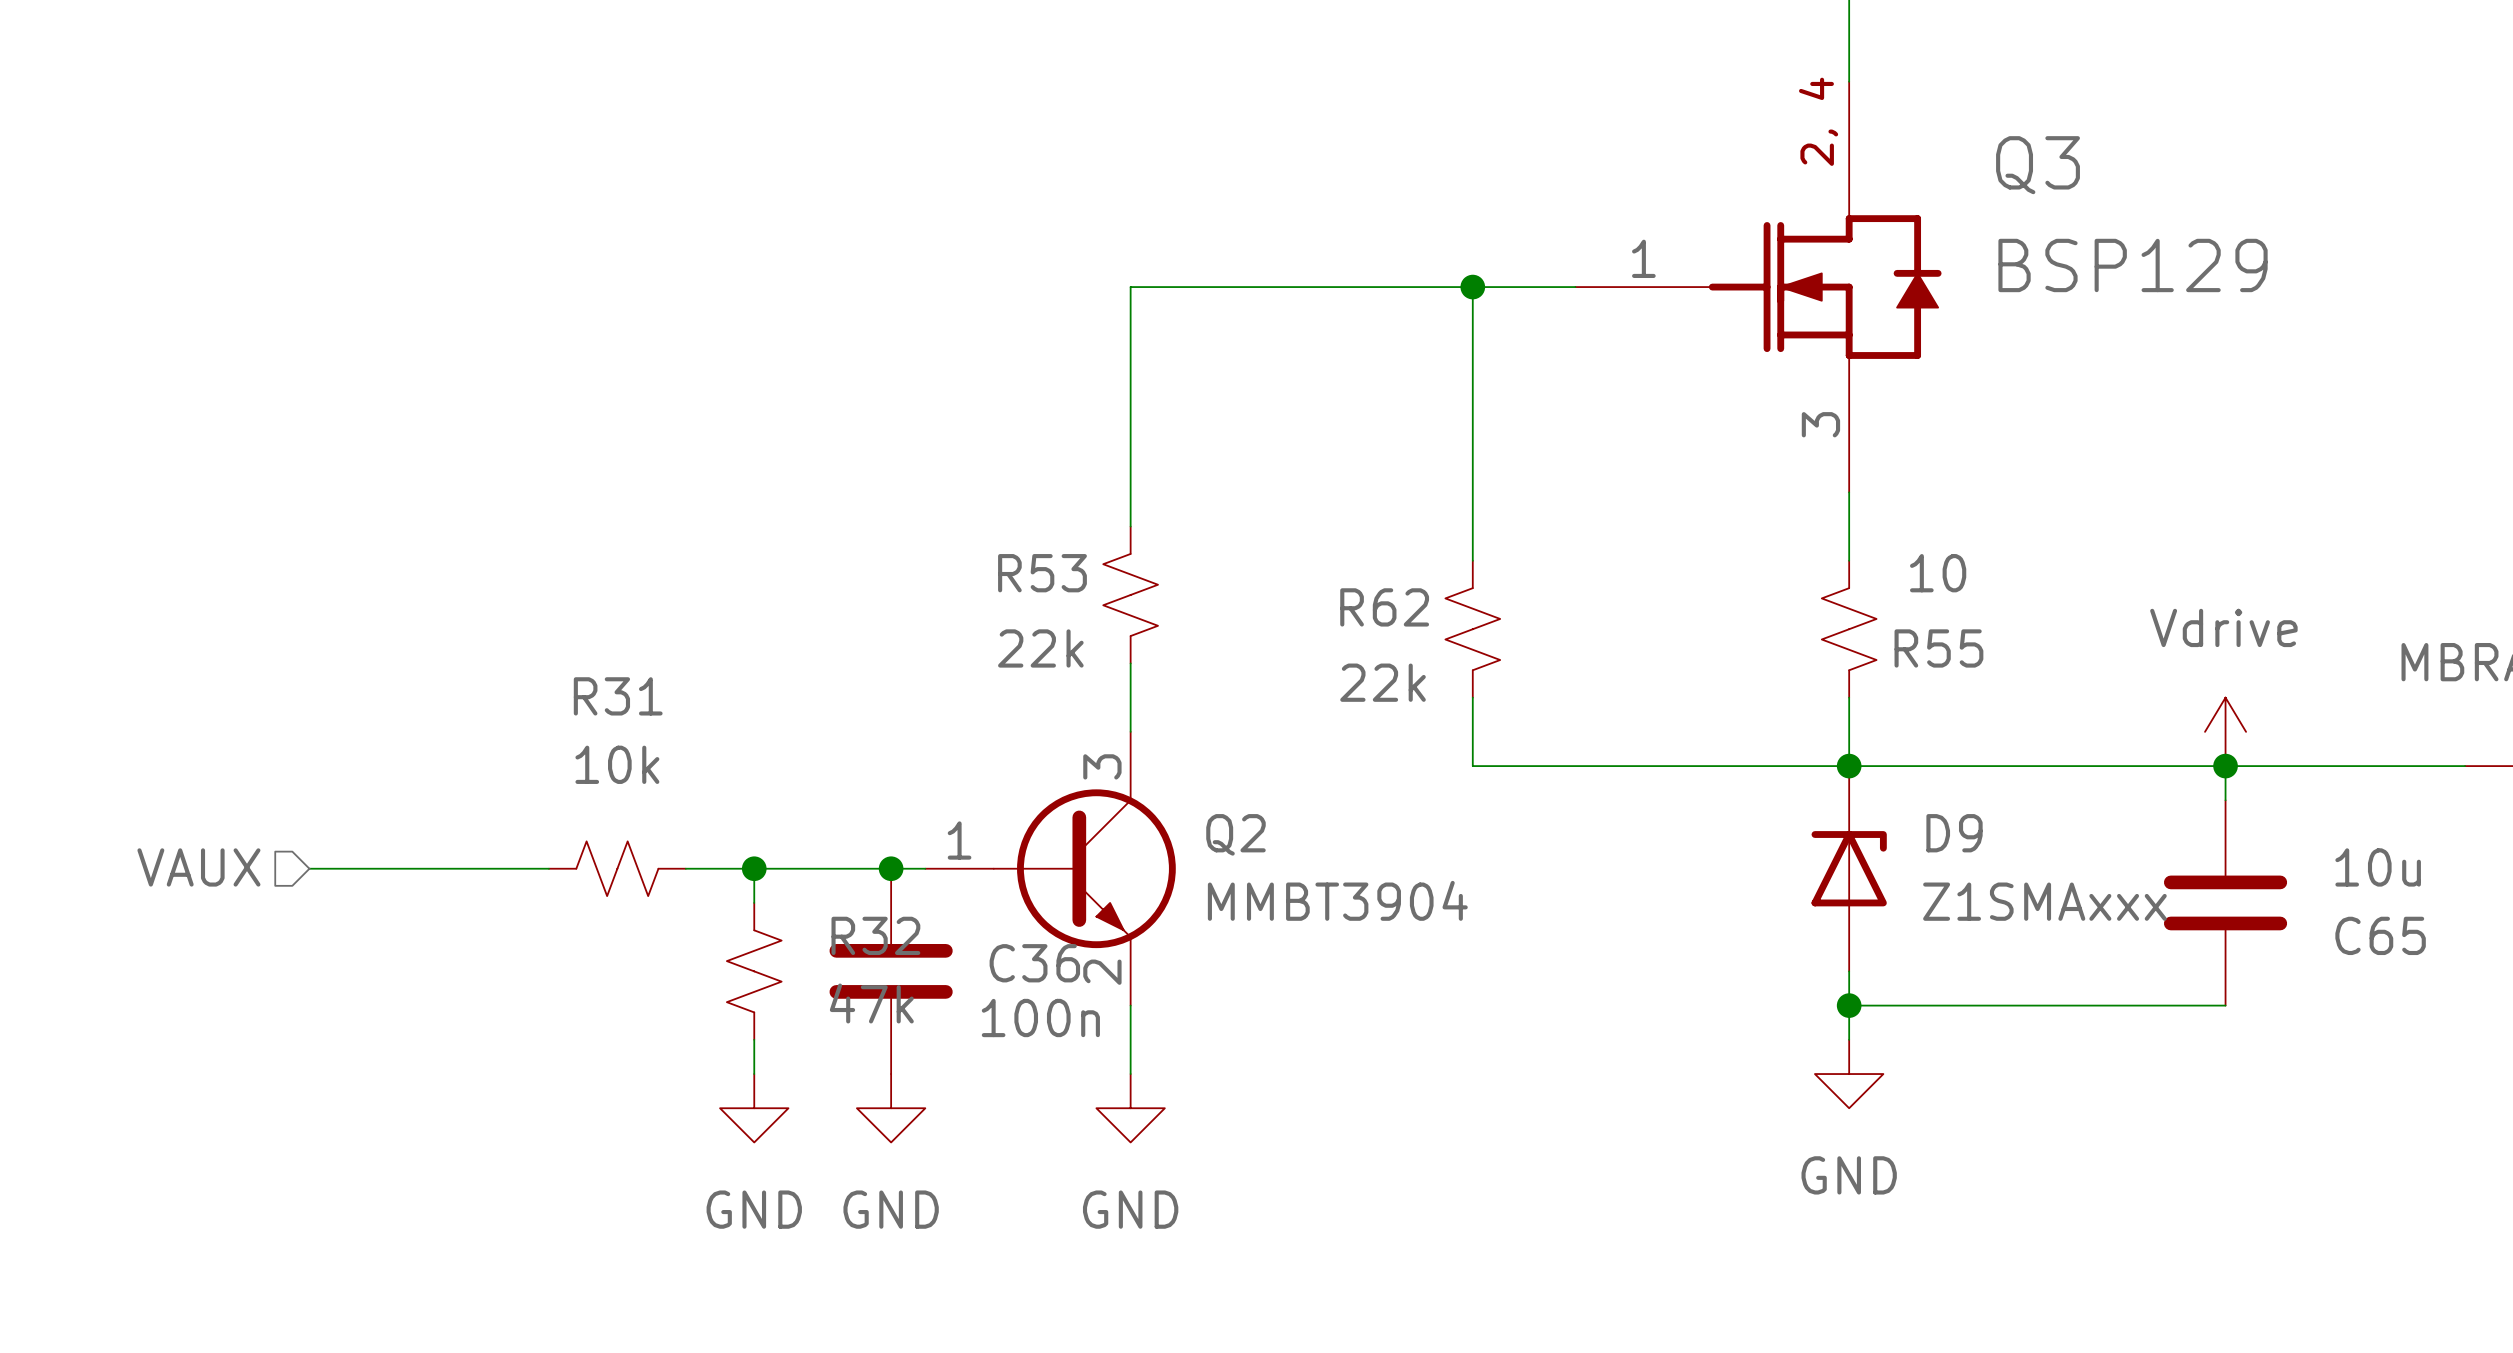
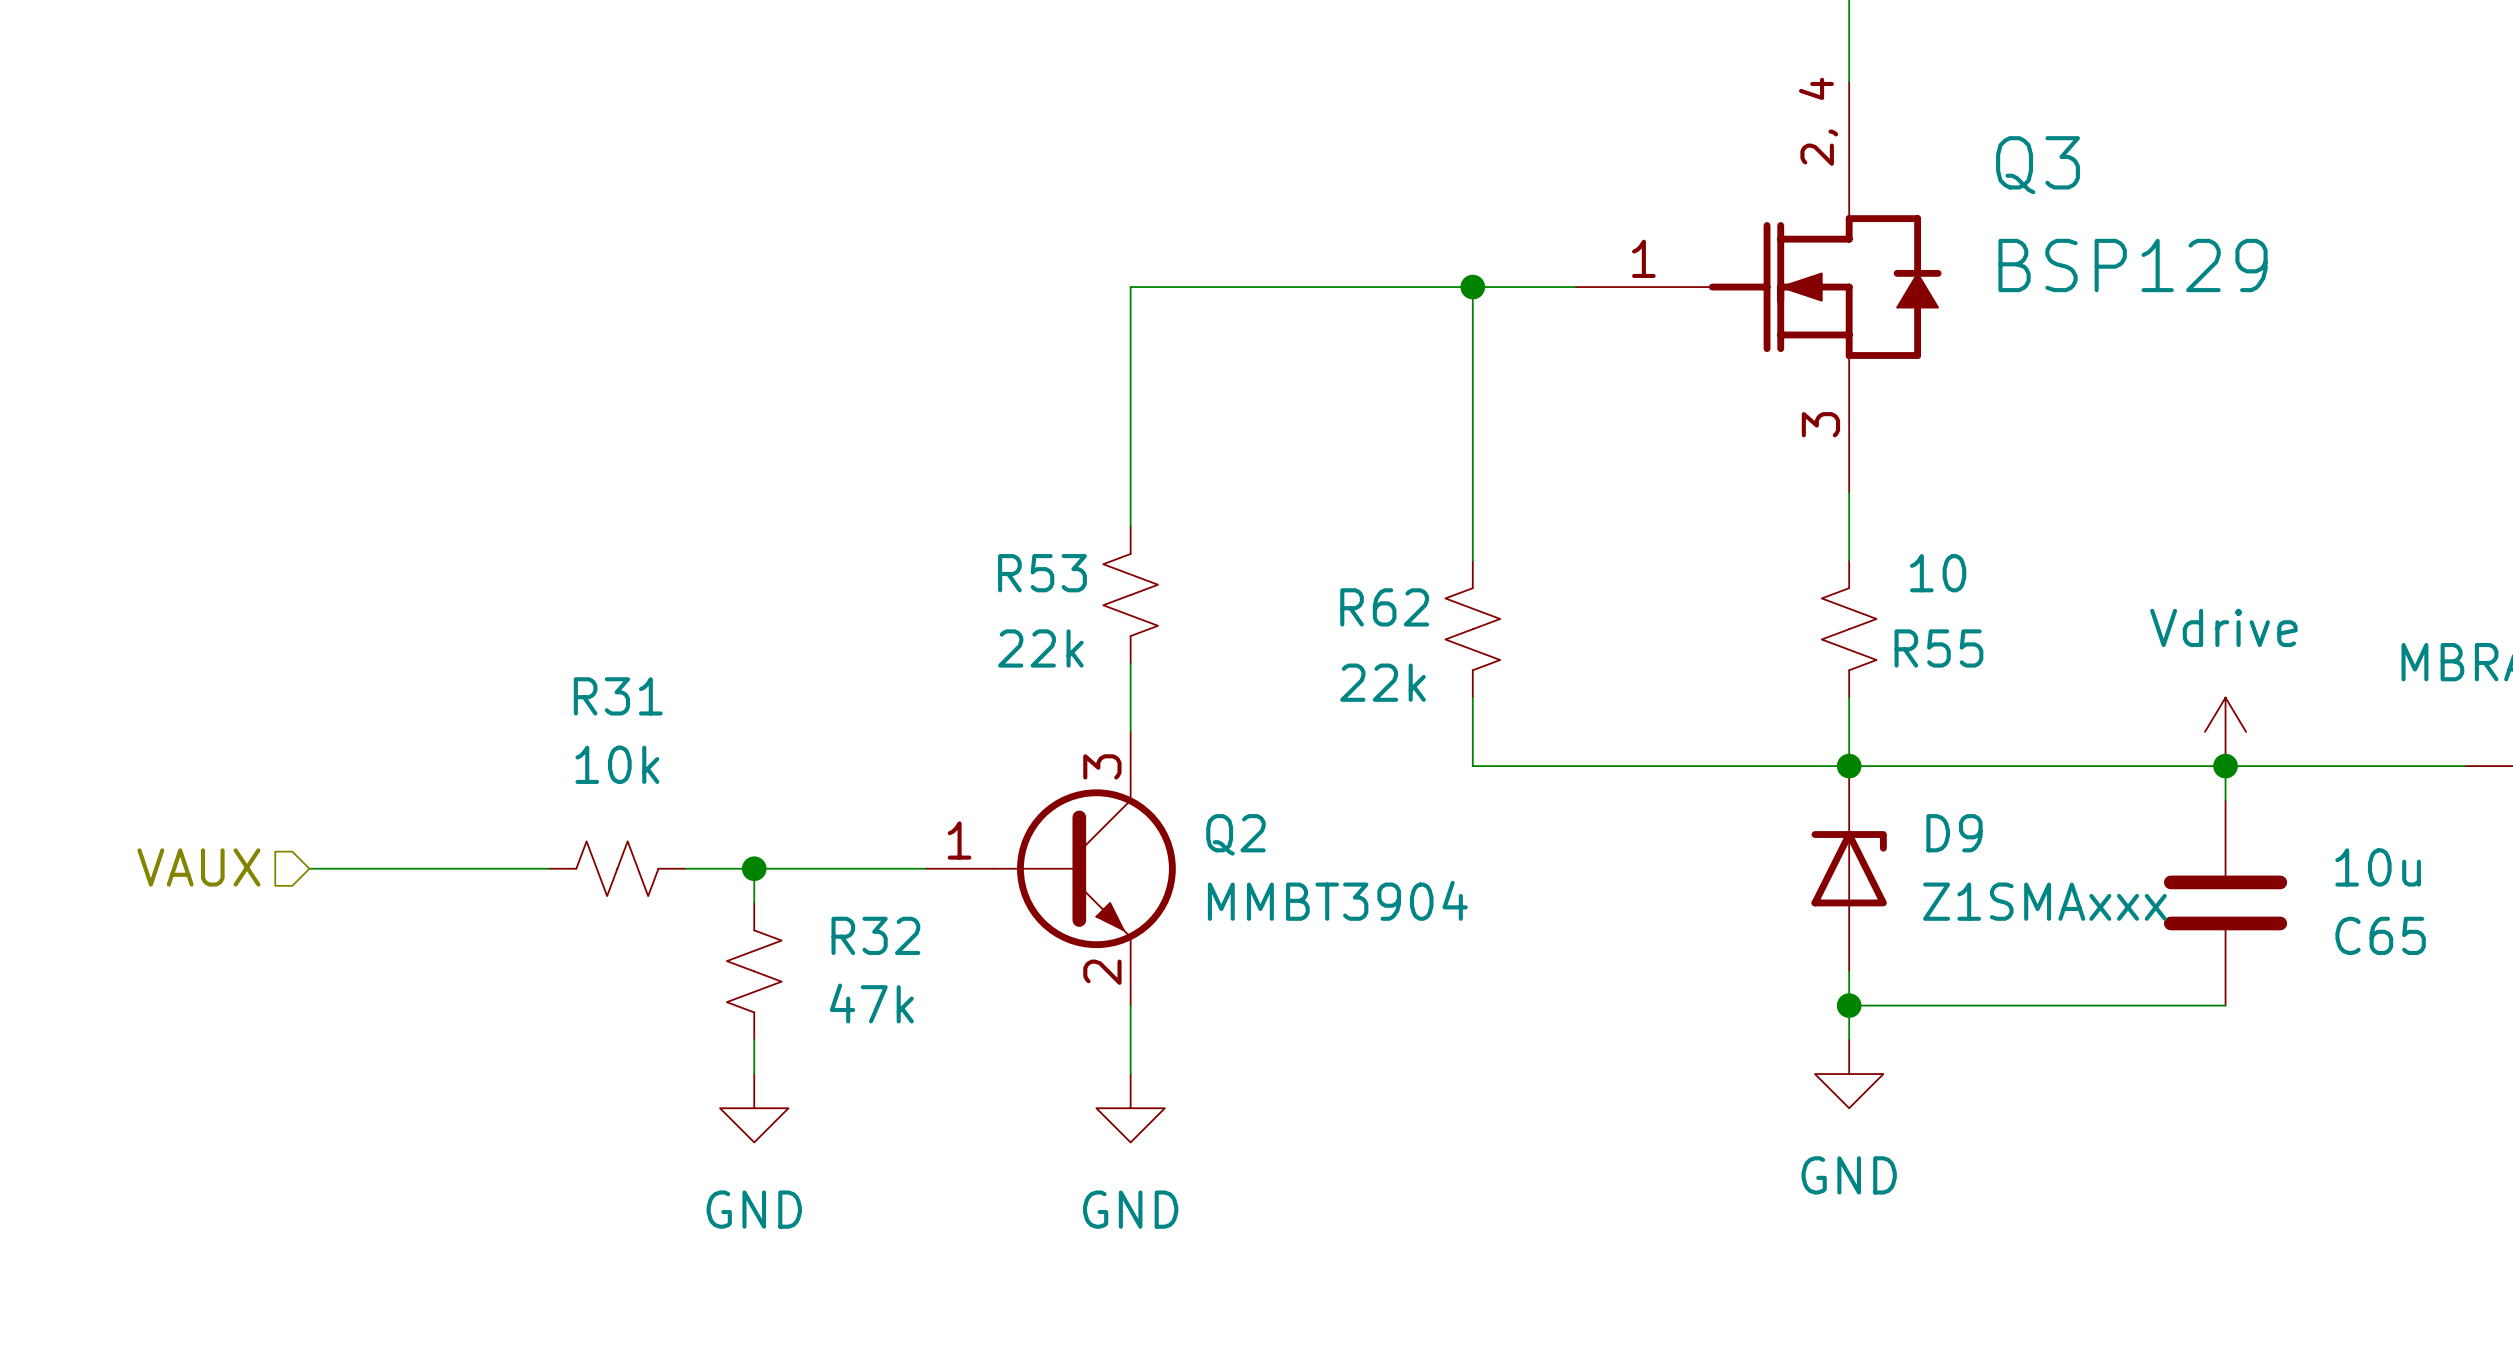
junction: (891, 868) -> none
C36: 100n (891, 971) -> none
power symbol: GND (891, 1108) -> none

